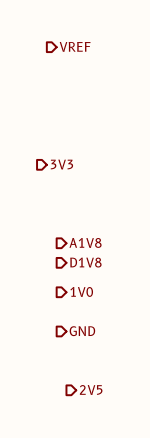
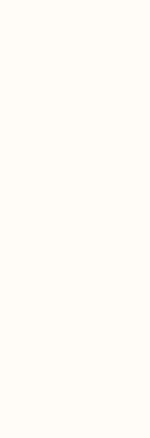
hierarchical label: VREF (75, 46) -> none
hierarchical label: 3V3 (61, 164) -> none
hierarchical label: A1V8 (85, 242) -> none
hierarchical label: D1V8 (85, 262) -> none
hierarchical label: 1V0 (81, 291) -> none
hierarchical label: GND (82, 331) -> none
hierarchical label: 2V5 (91, 390) -> none

